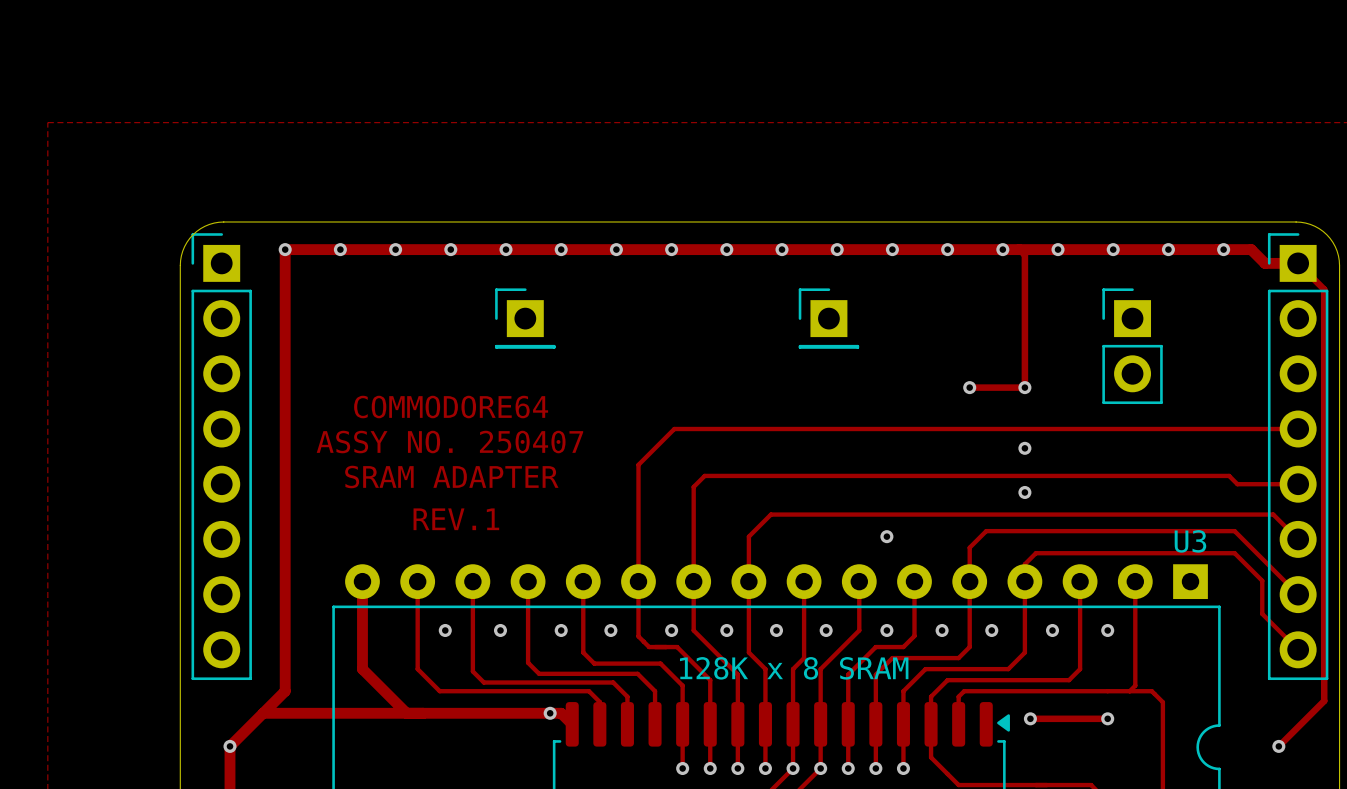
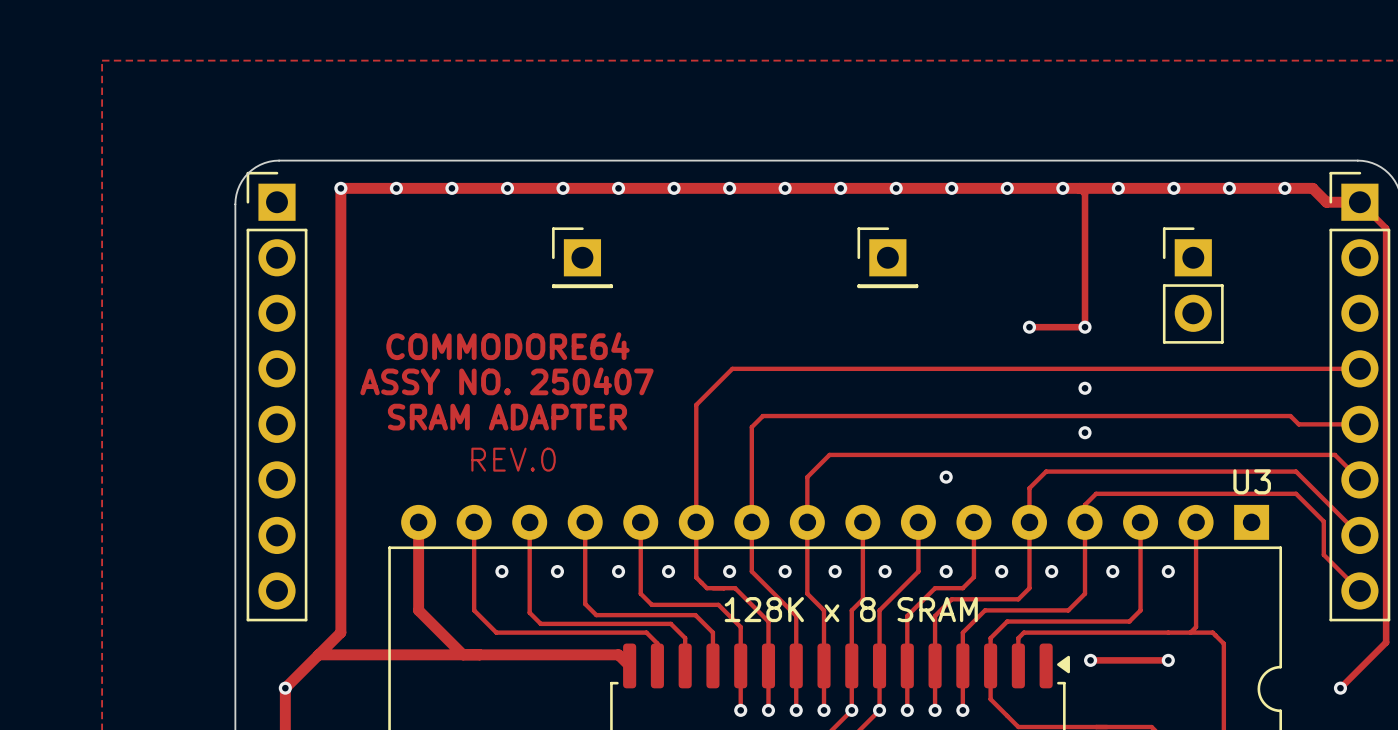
text: REV.1 (456, 519) -> REV.0 (513, 459)
via: (550, 713) -> none

